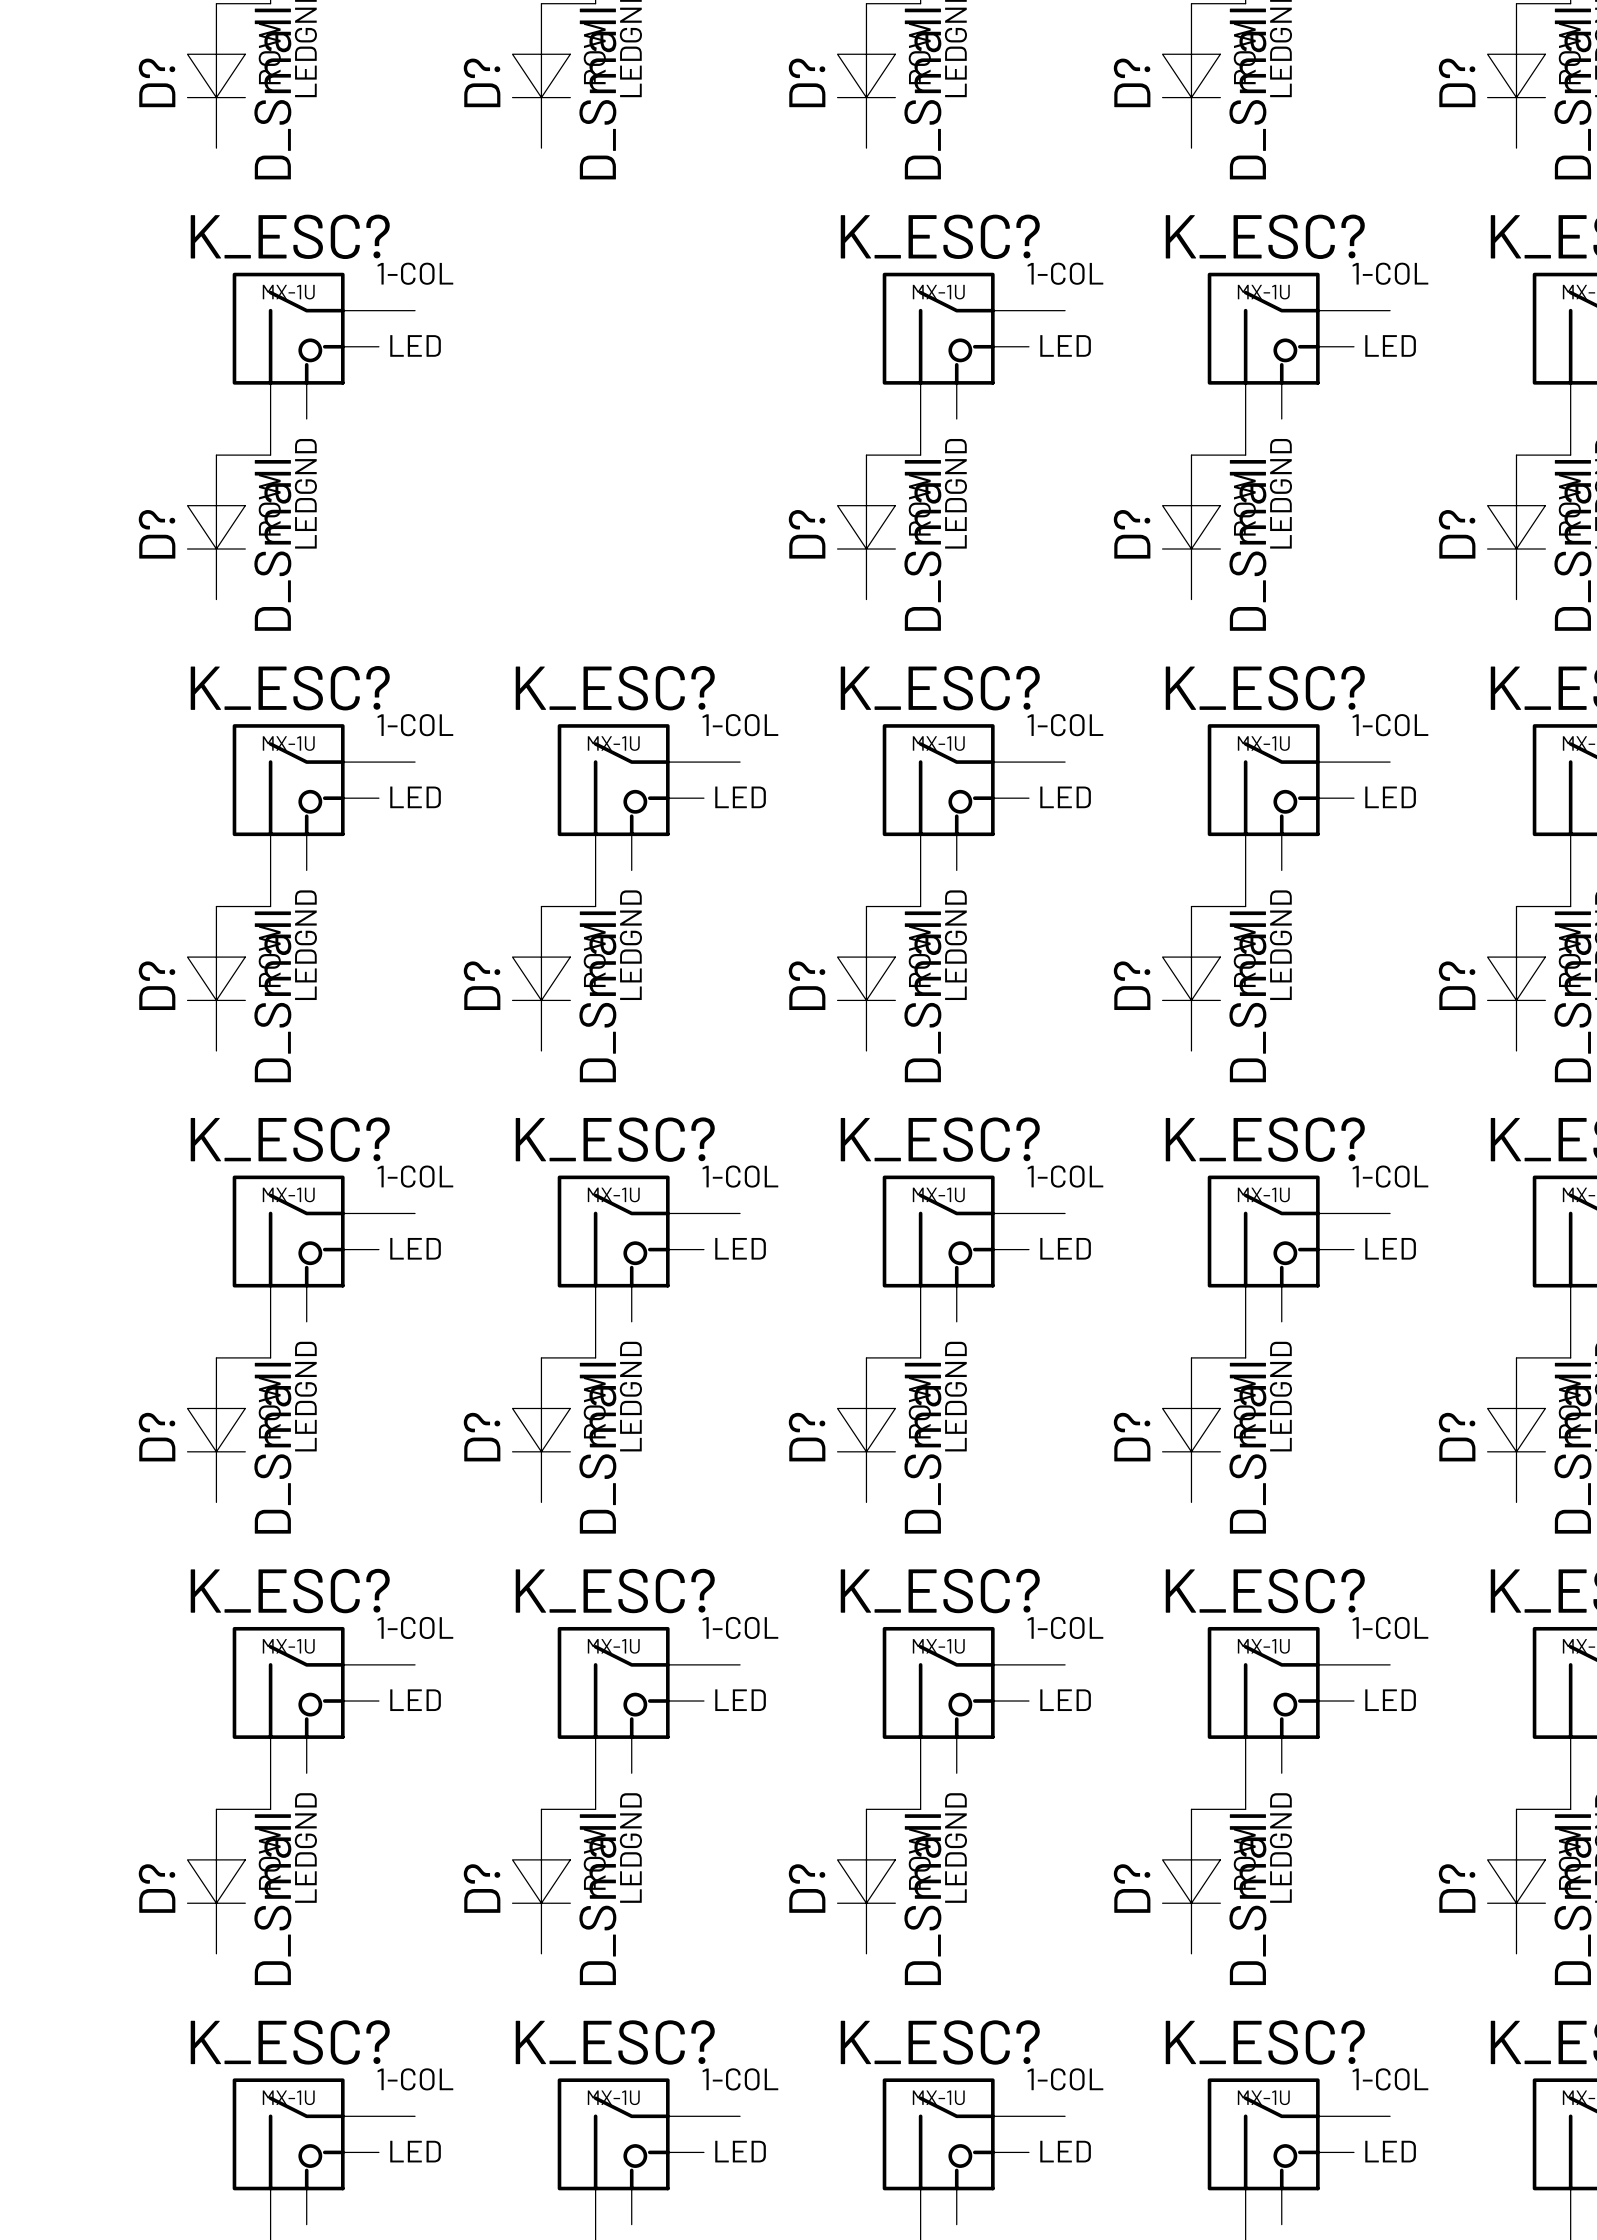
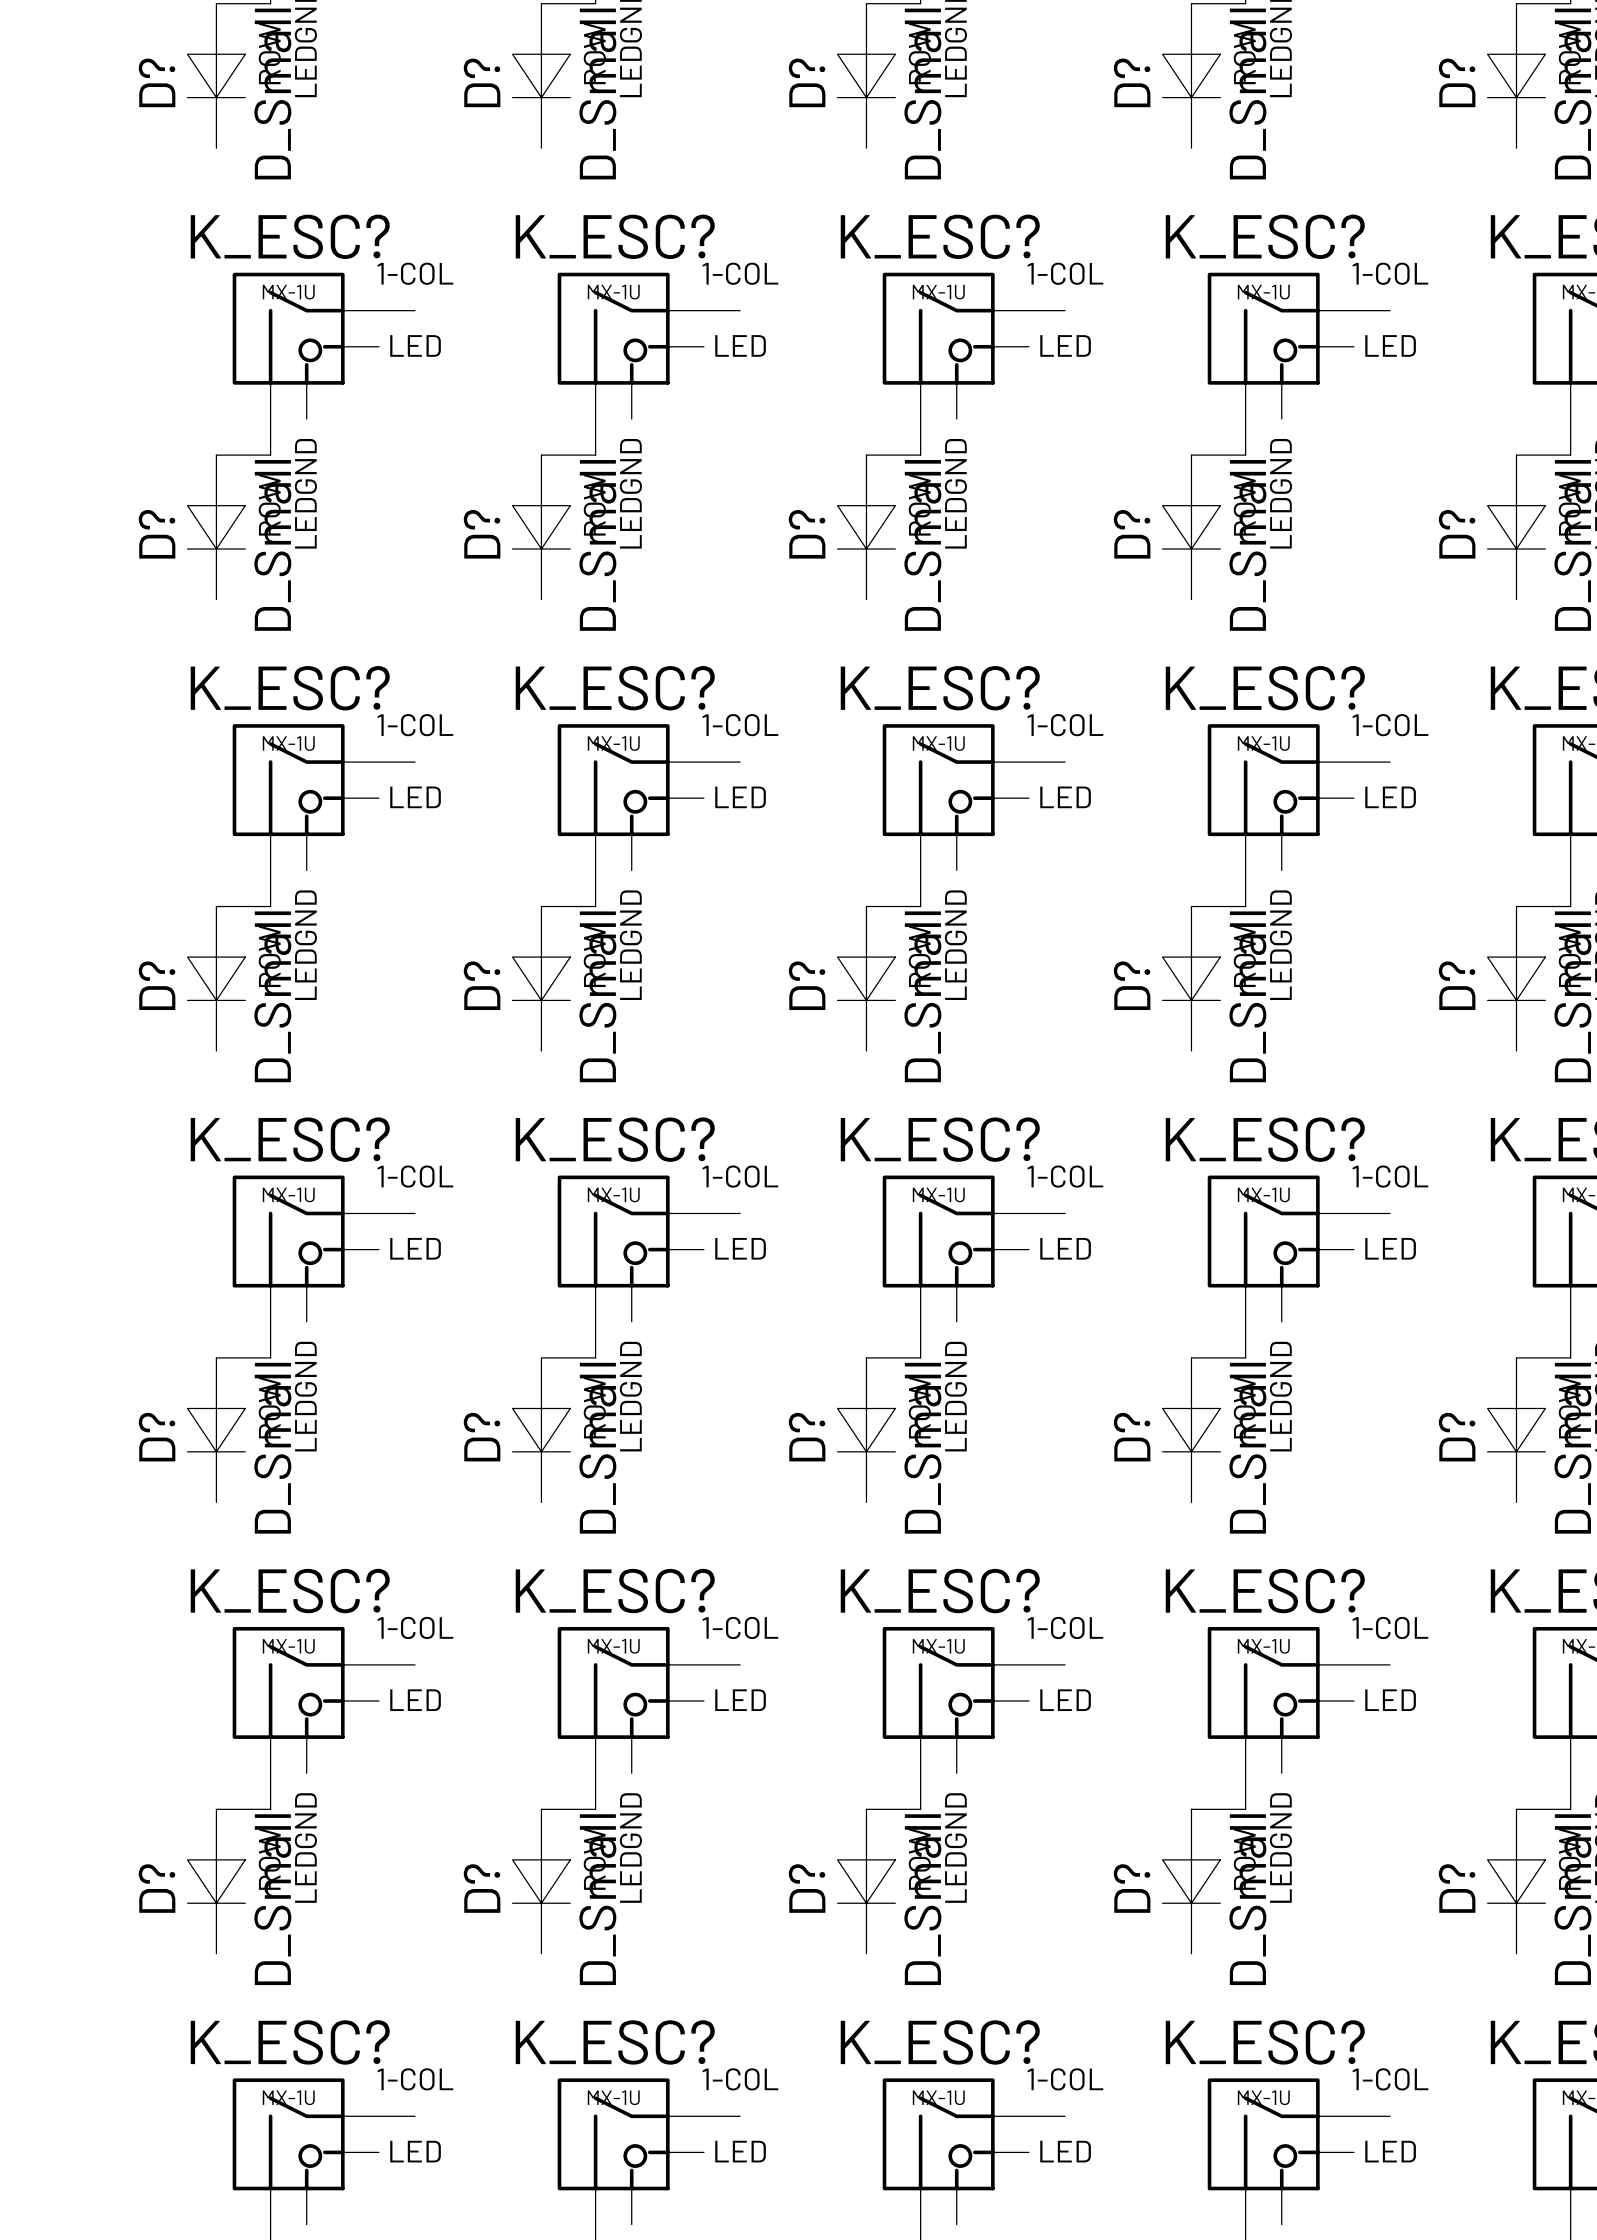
K_ESC?: none -> MX-1U (648, 363)
wire: none -> (541, 455) (595, 455)
D?: none -> D_Small (541, 527)

